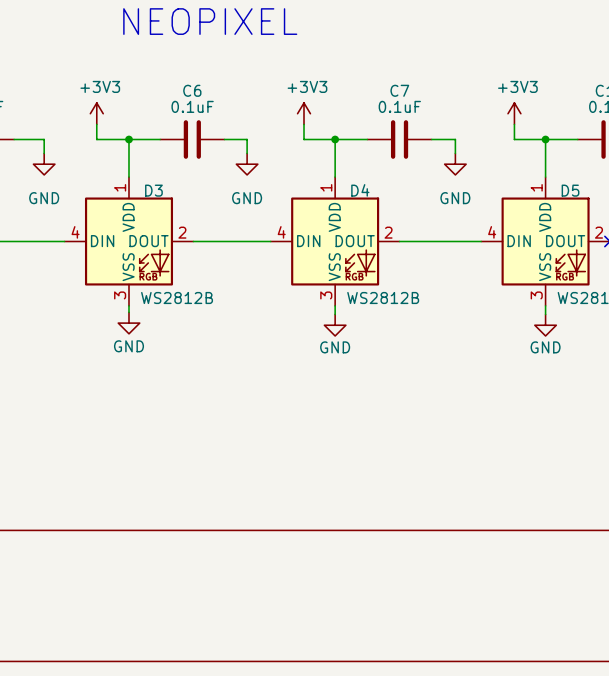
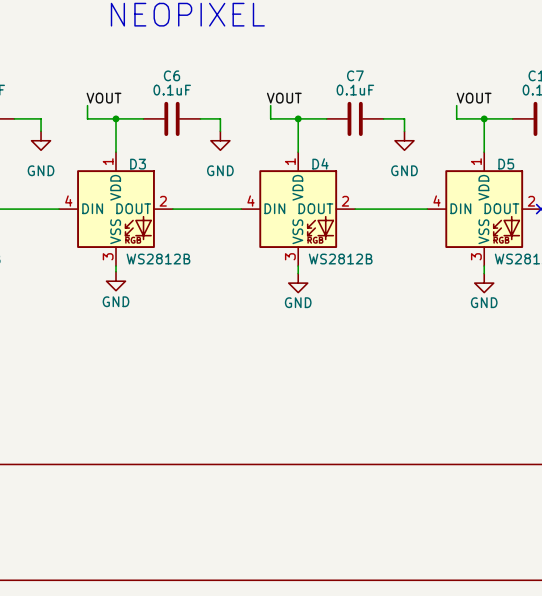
power symbol: +3V3 (96, 113) -> none
power symbol: +3V3 (304, 113) -> none
power symbol: +3V3 (514, 113) -> none
label: none -> VOUT (104, 98)
label: none -> VOUT (284, 98)
label: none -> VOUT (474, 98)

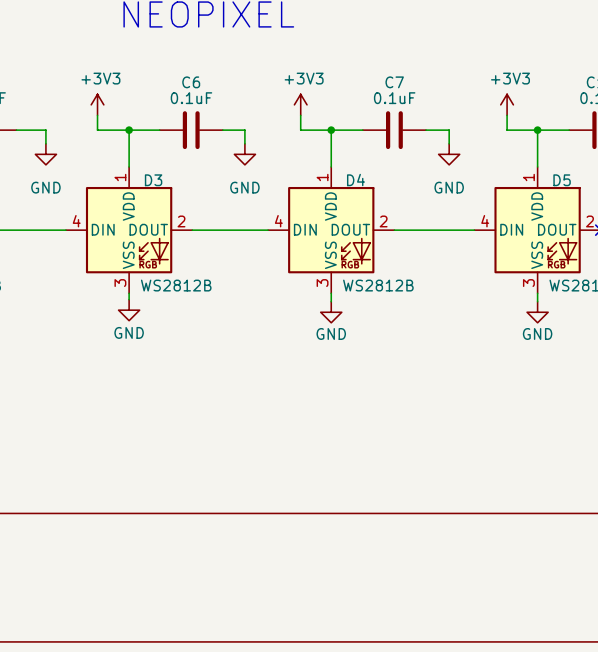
power symbol: none -> +3V3 (97, 104)
power symbol: none -> +3V3 (300, 104)
power symbol: none -> +3V3 (507, 104)
label: VOUT (104, 98) -> none
label: VOUT (284, 98) -> none
label: VOUT (474, 98) -> none

